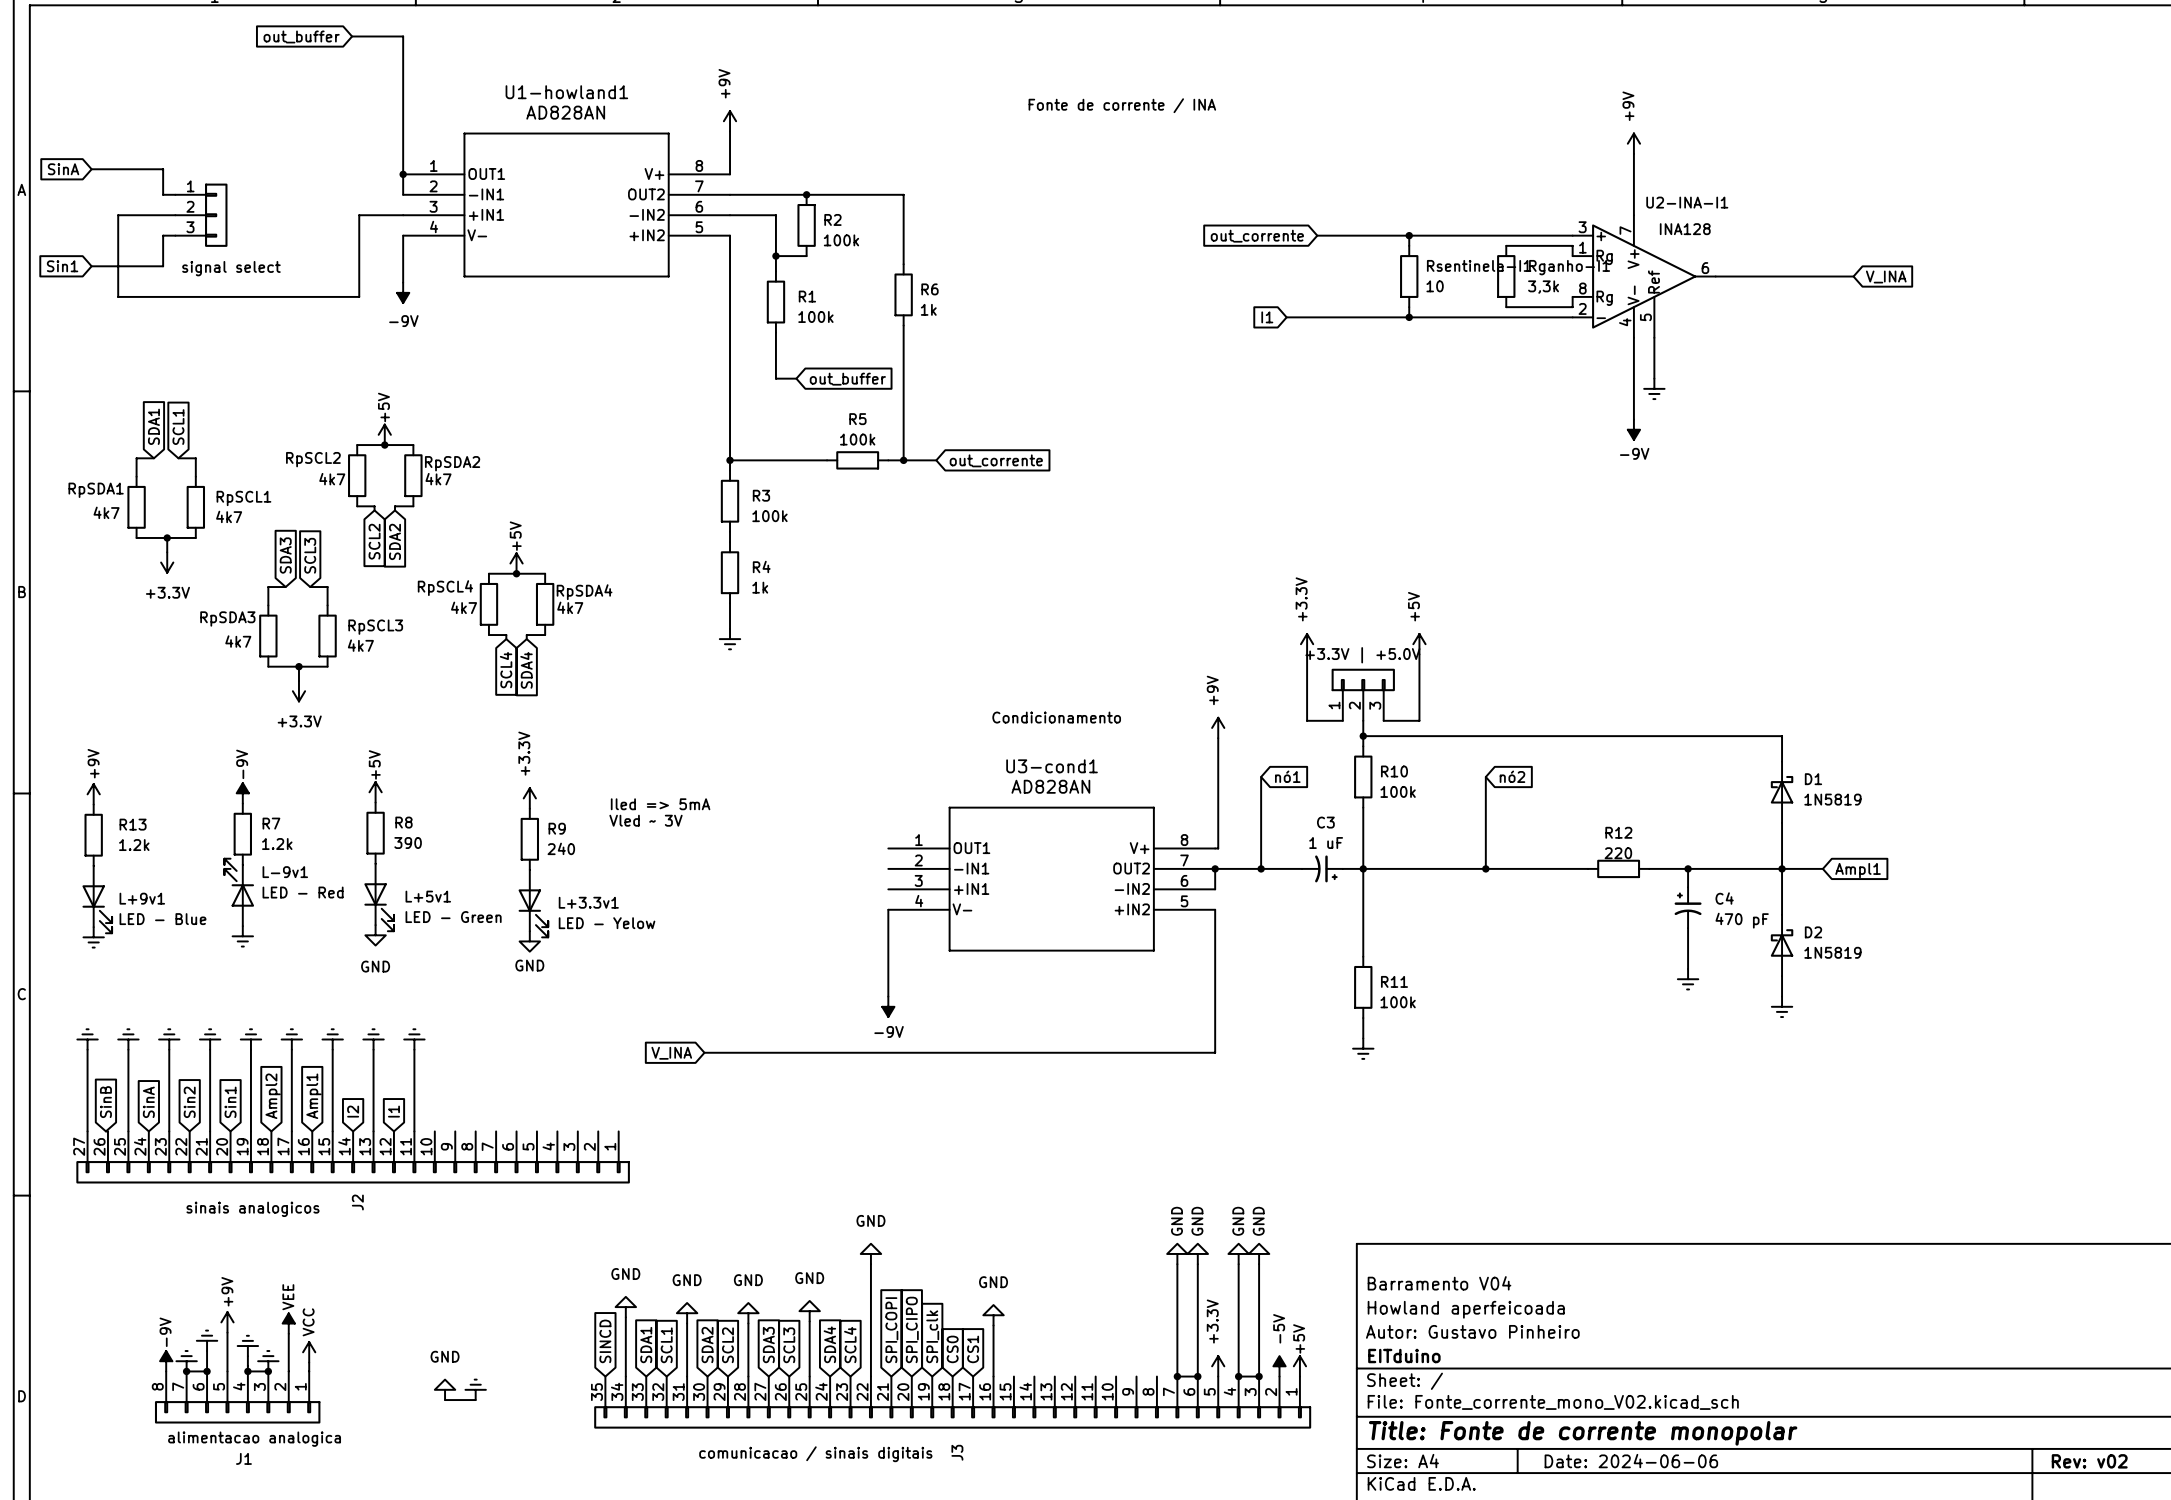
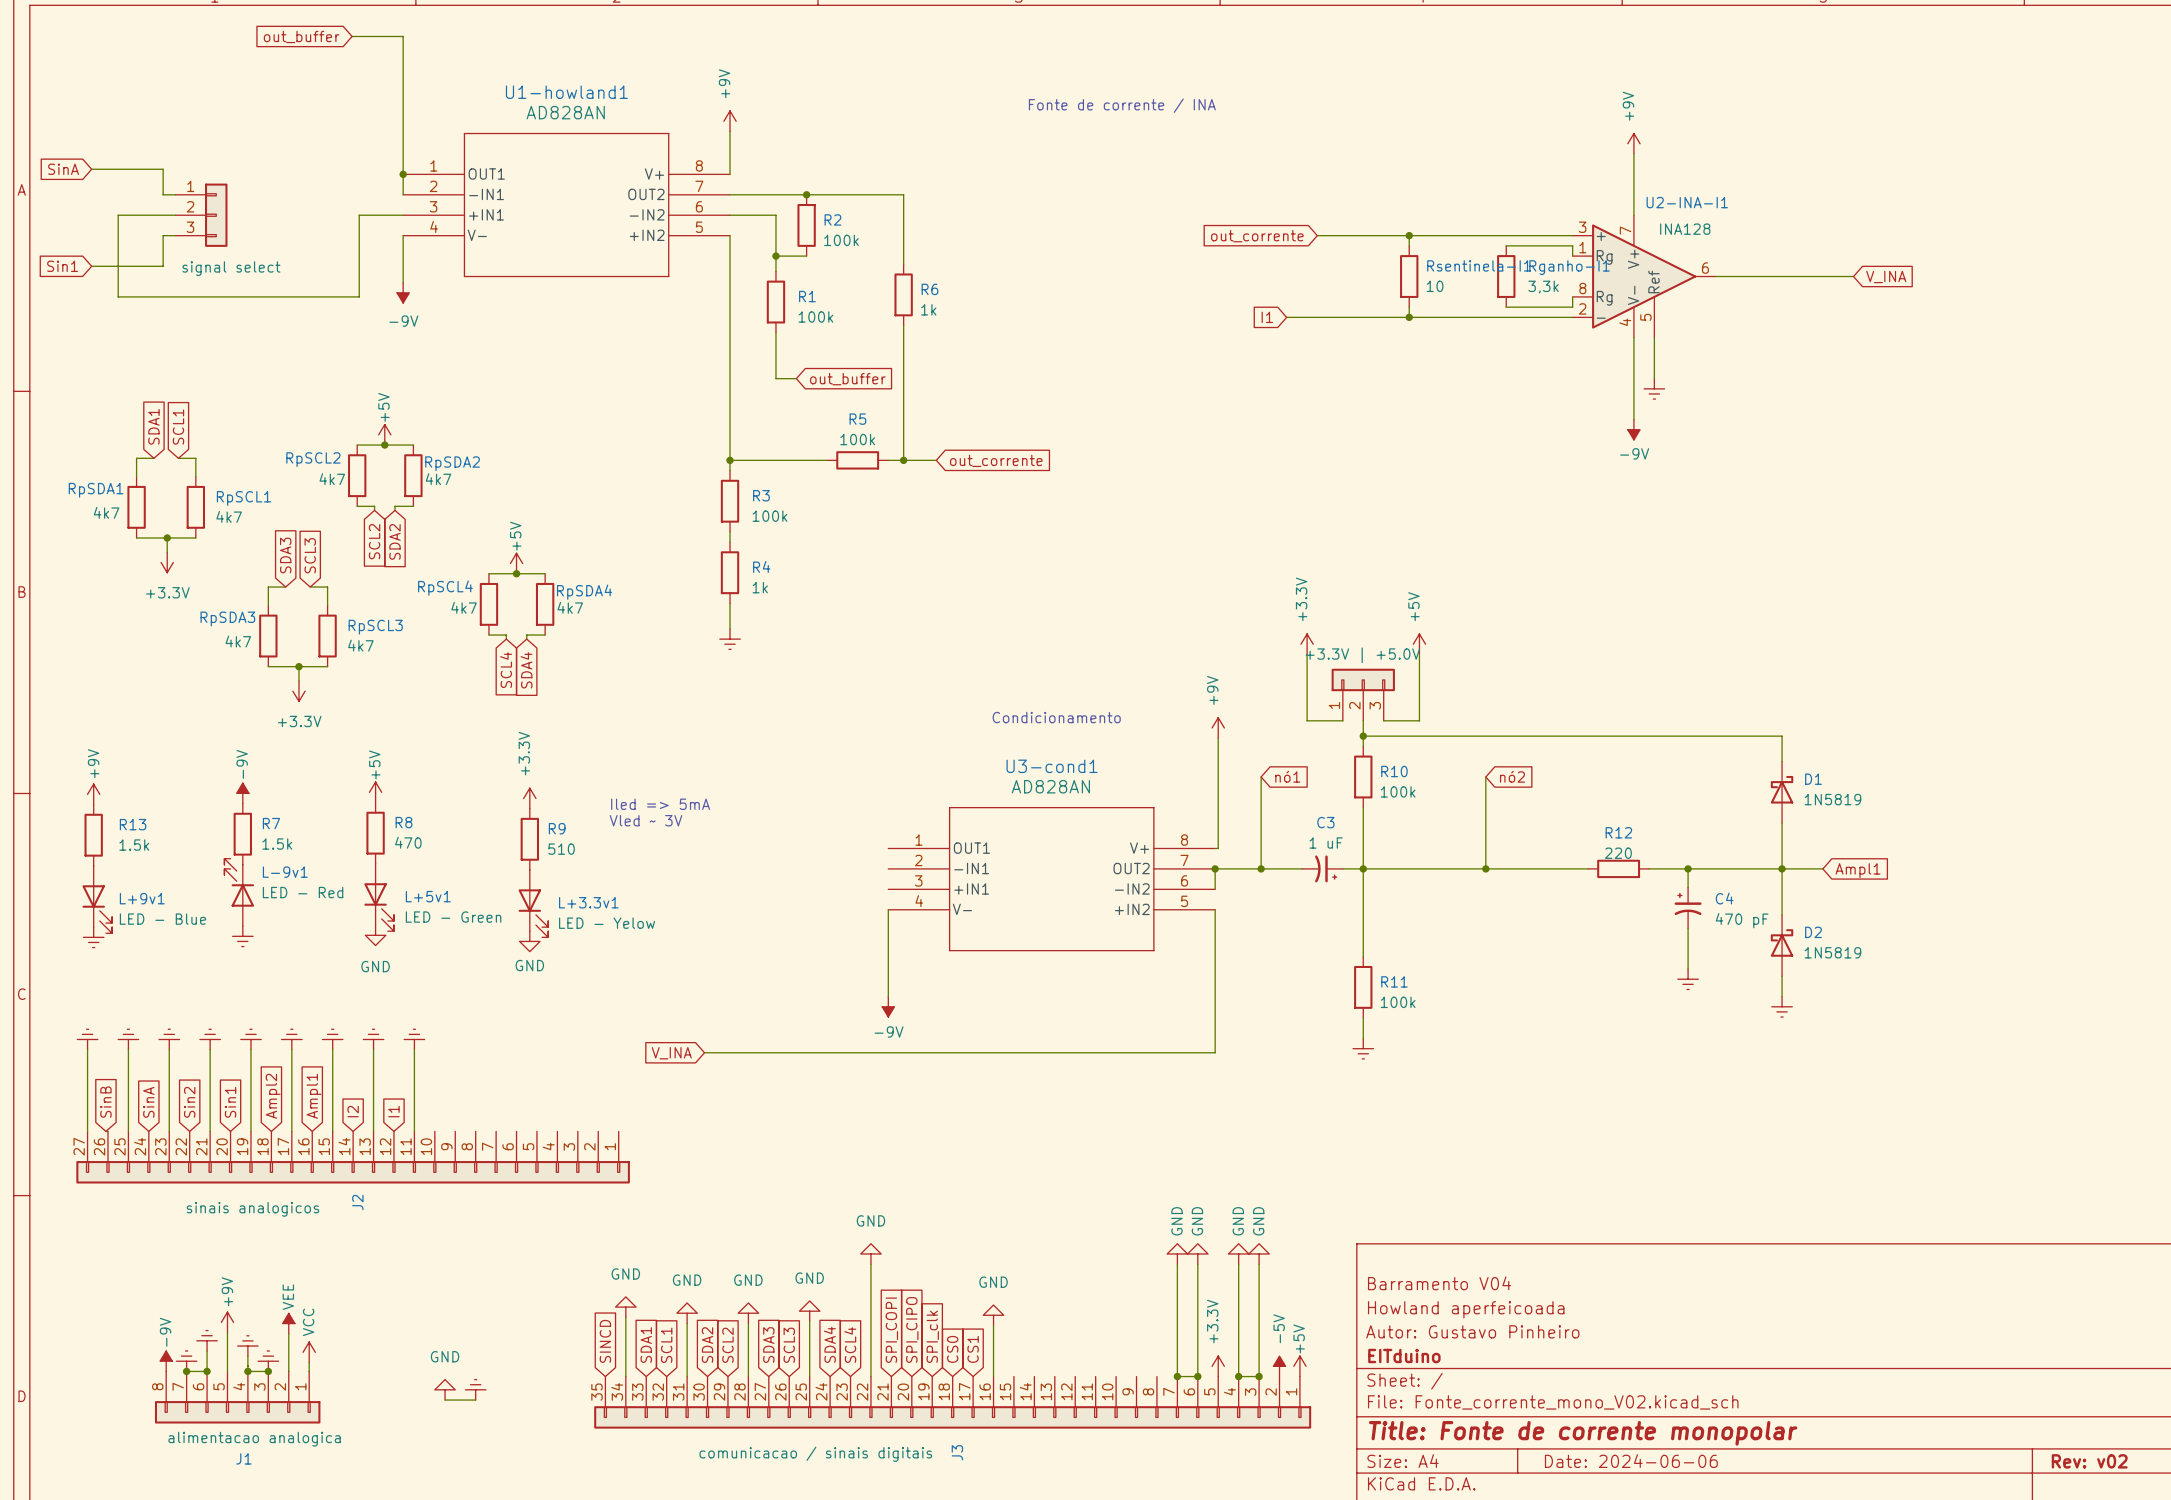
R8 value: 390 (408, 843) -> 470 (408, 842)
R7 value: 1.2k (277, 844) -> 1.5k (277, 844)
R13 value: 1.2k (134, 845) -> 1.5k (134, 845)
R9 value: 240 (561, 848) -> 510 (561, 849)

